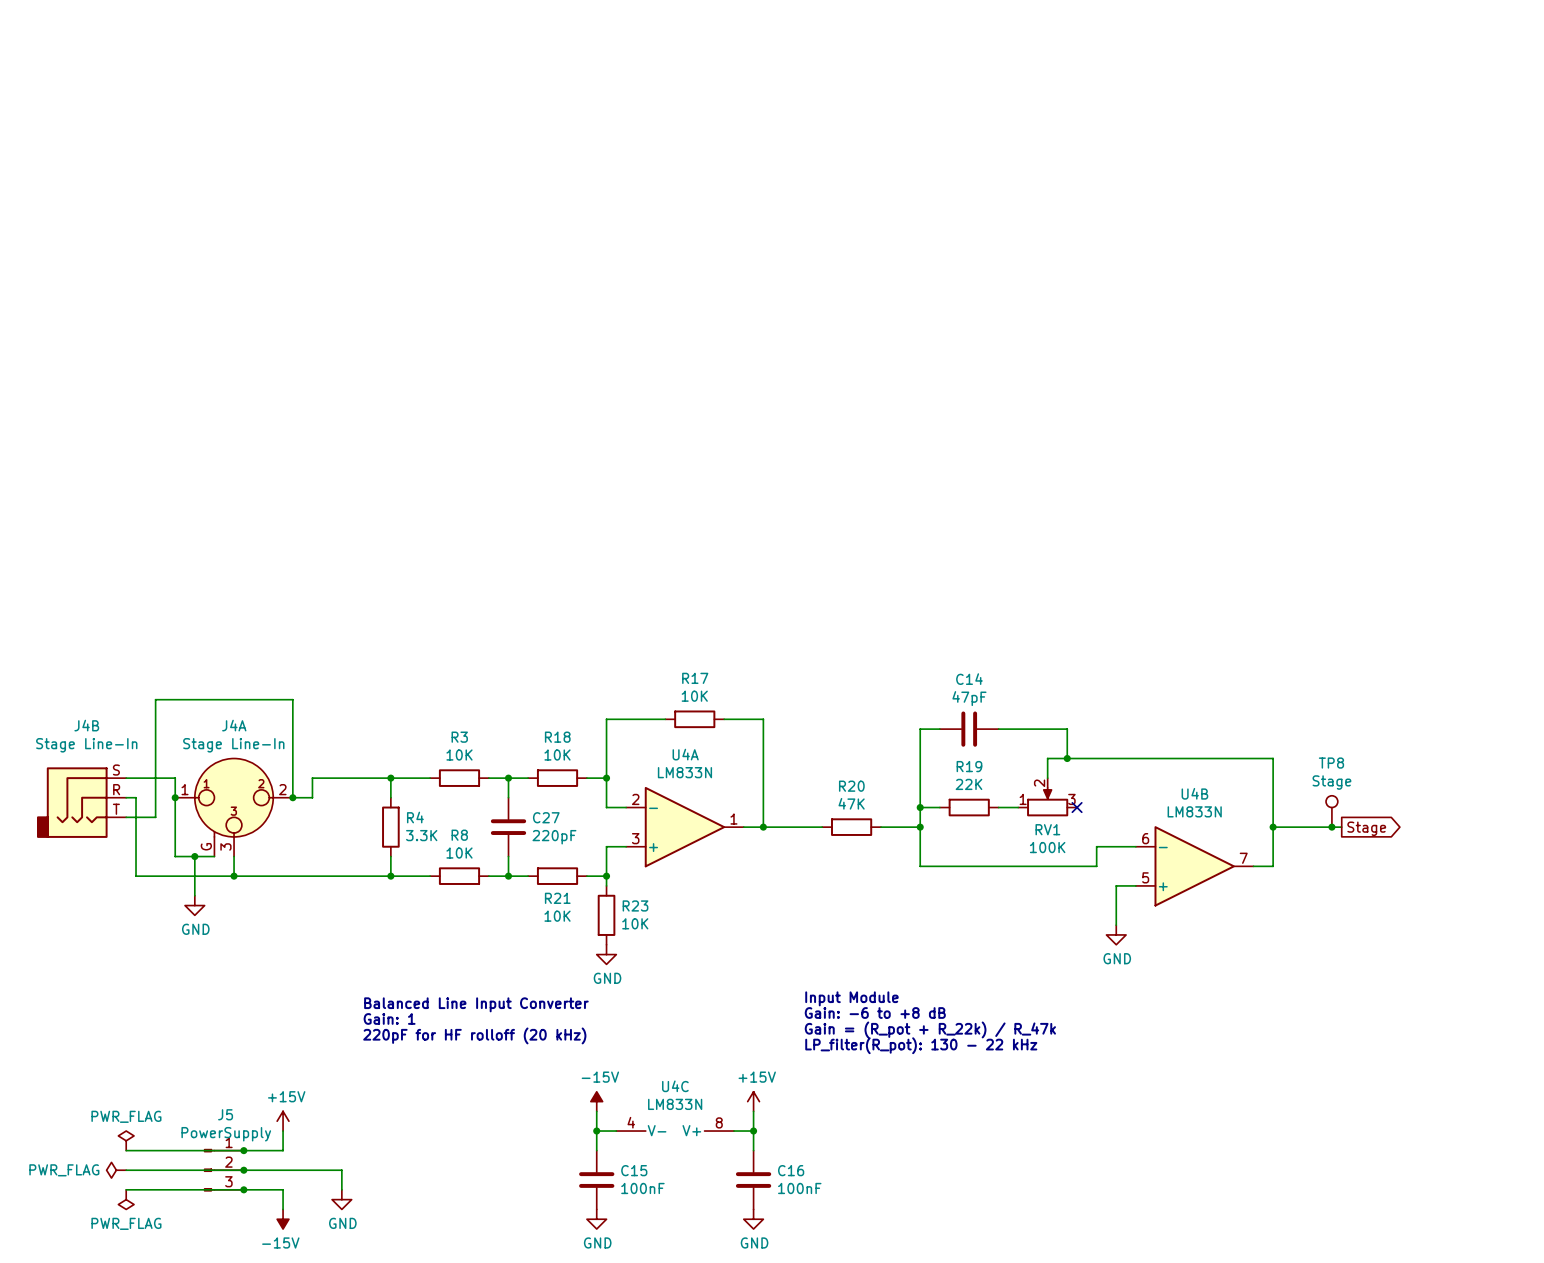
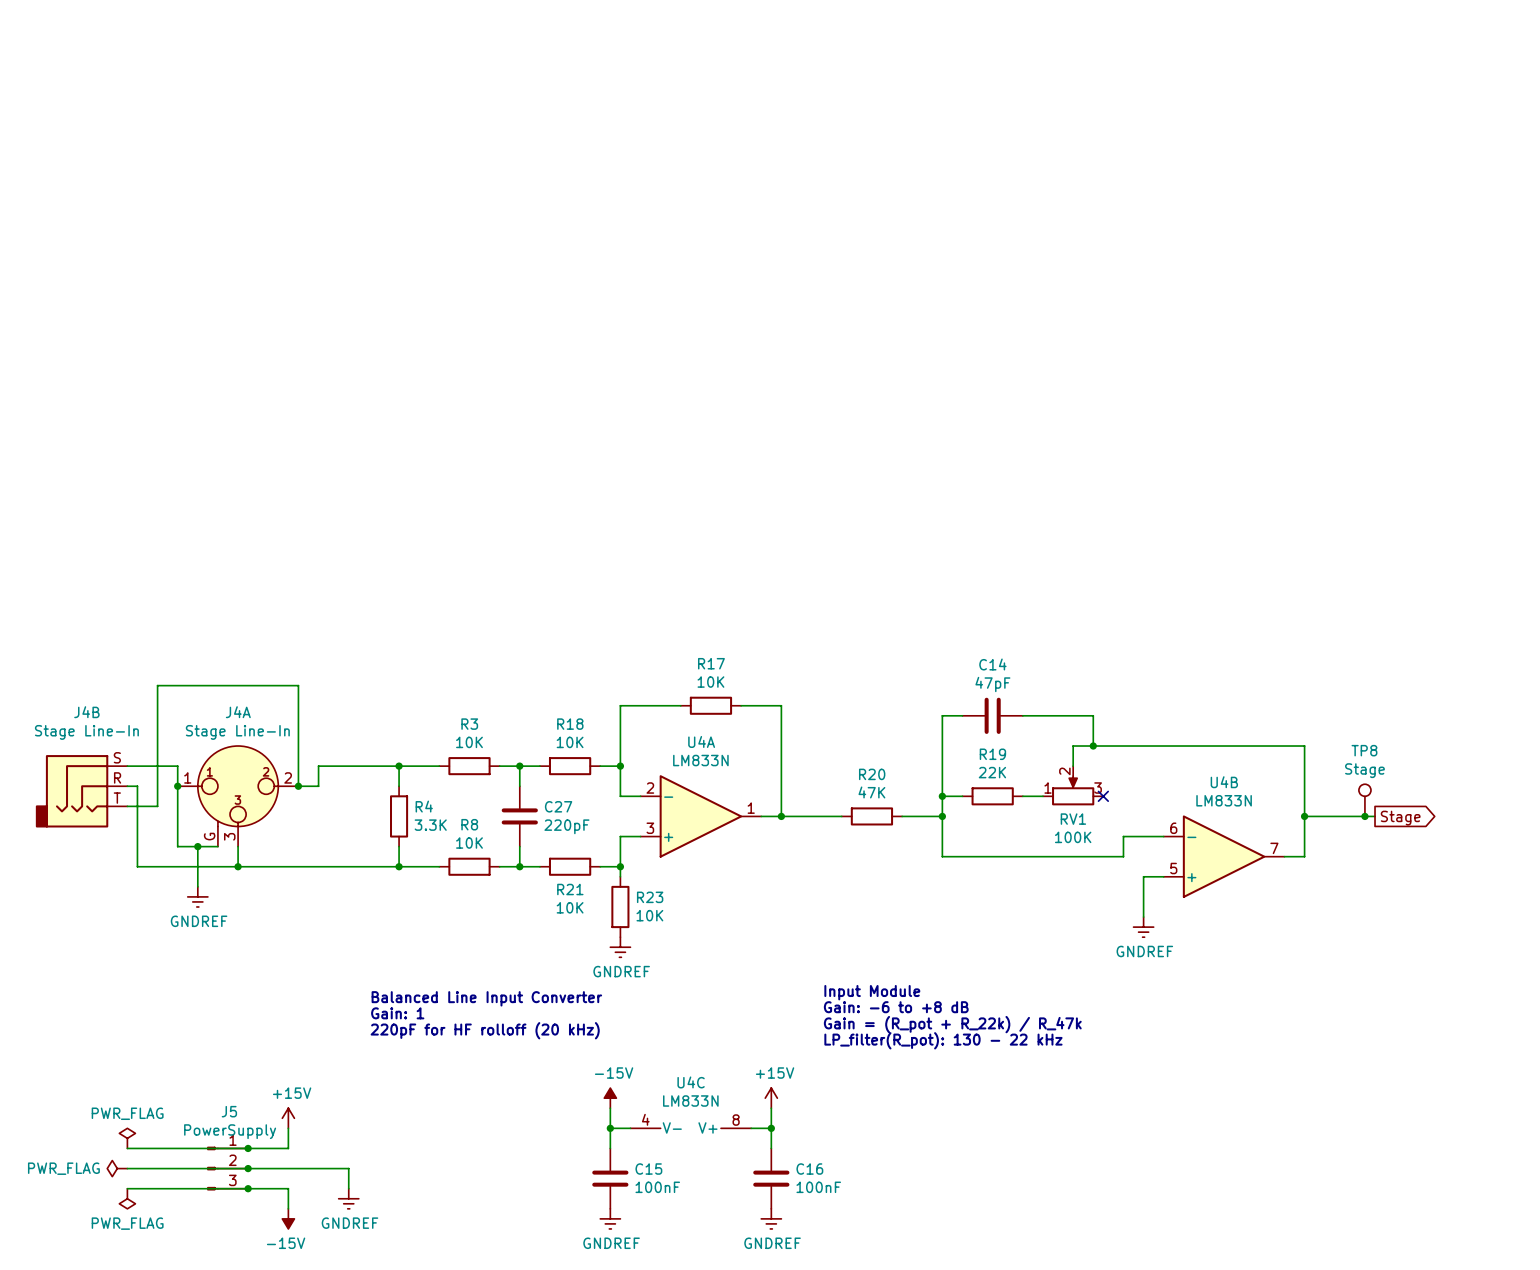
power symbol: GND (194, 905) -> GNDREF (197, 896)
power symbol: GND (1116, 934) -> GNDREF (1143, 927)
power symbol: GND (606, 954) -> GNDREF (620, 947)
power symbol: GND (341, 1199) -> GNDREF (348, 1198)
power symbol: GND (596, 1219) -> GNDREF (610, 1218)
power symbol: GND (753, 1219) -> GNDREF (771, 1218)

